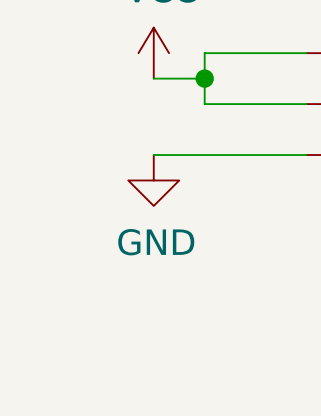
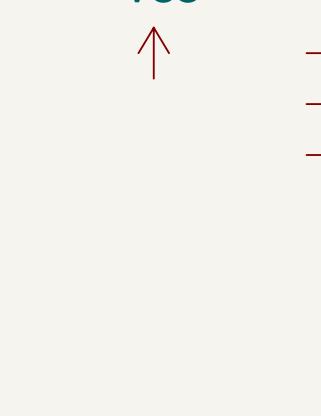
wire: (306, 53) (204, 53) (204, 104) (306, 104) -> none
wire: (153, 78) (204, 78) -> none
junction: (204, 78) -> none
wire: (153, 155) (306, 155) -> none
power symbol: GND (153, 180) -> none

